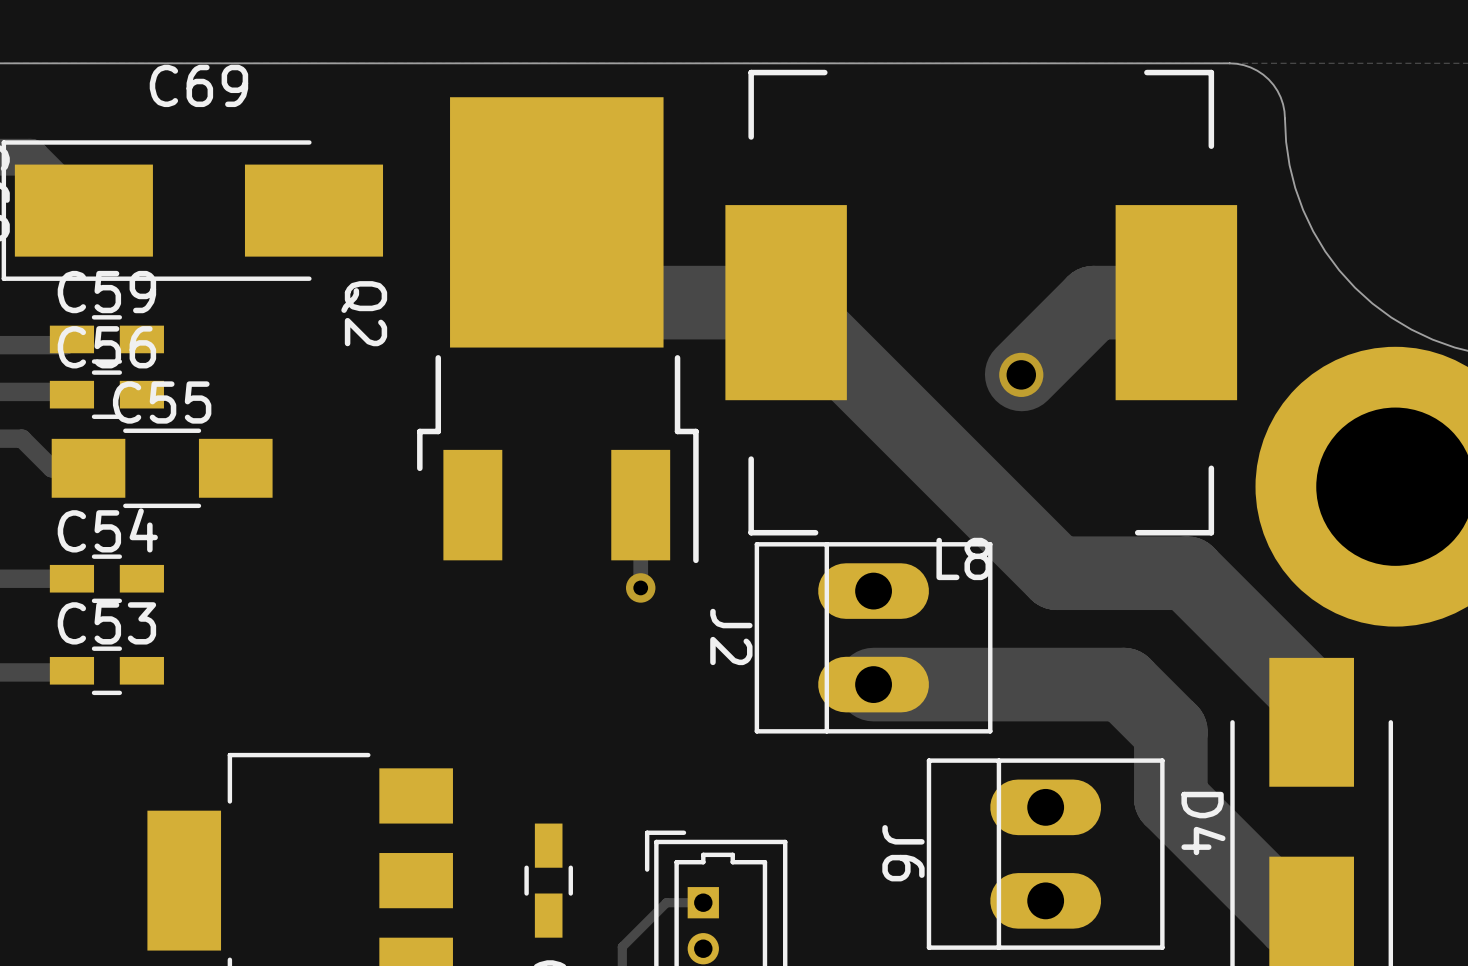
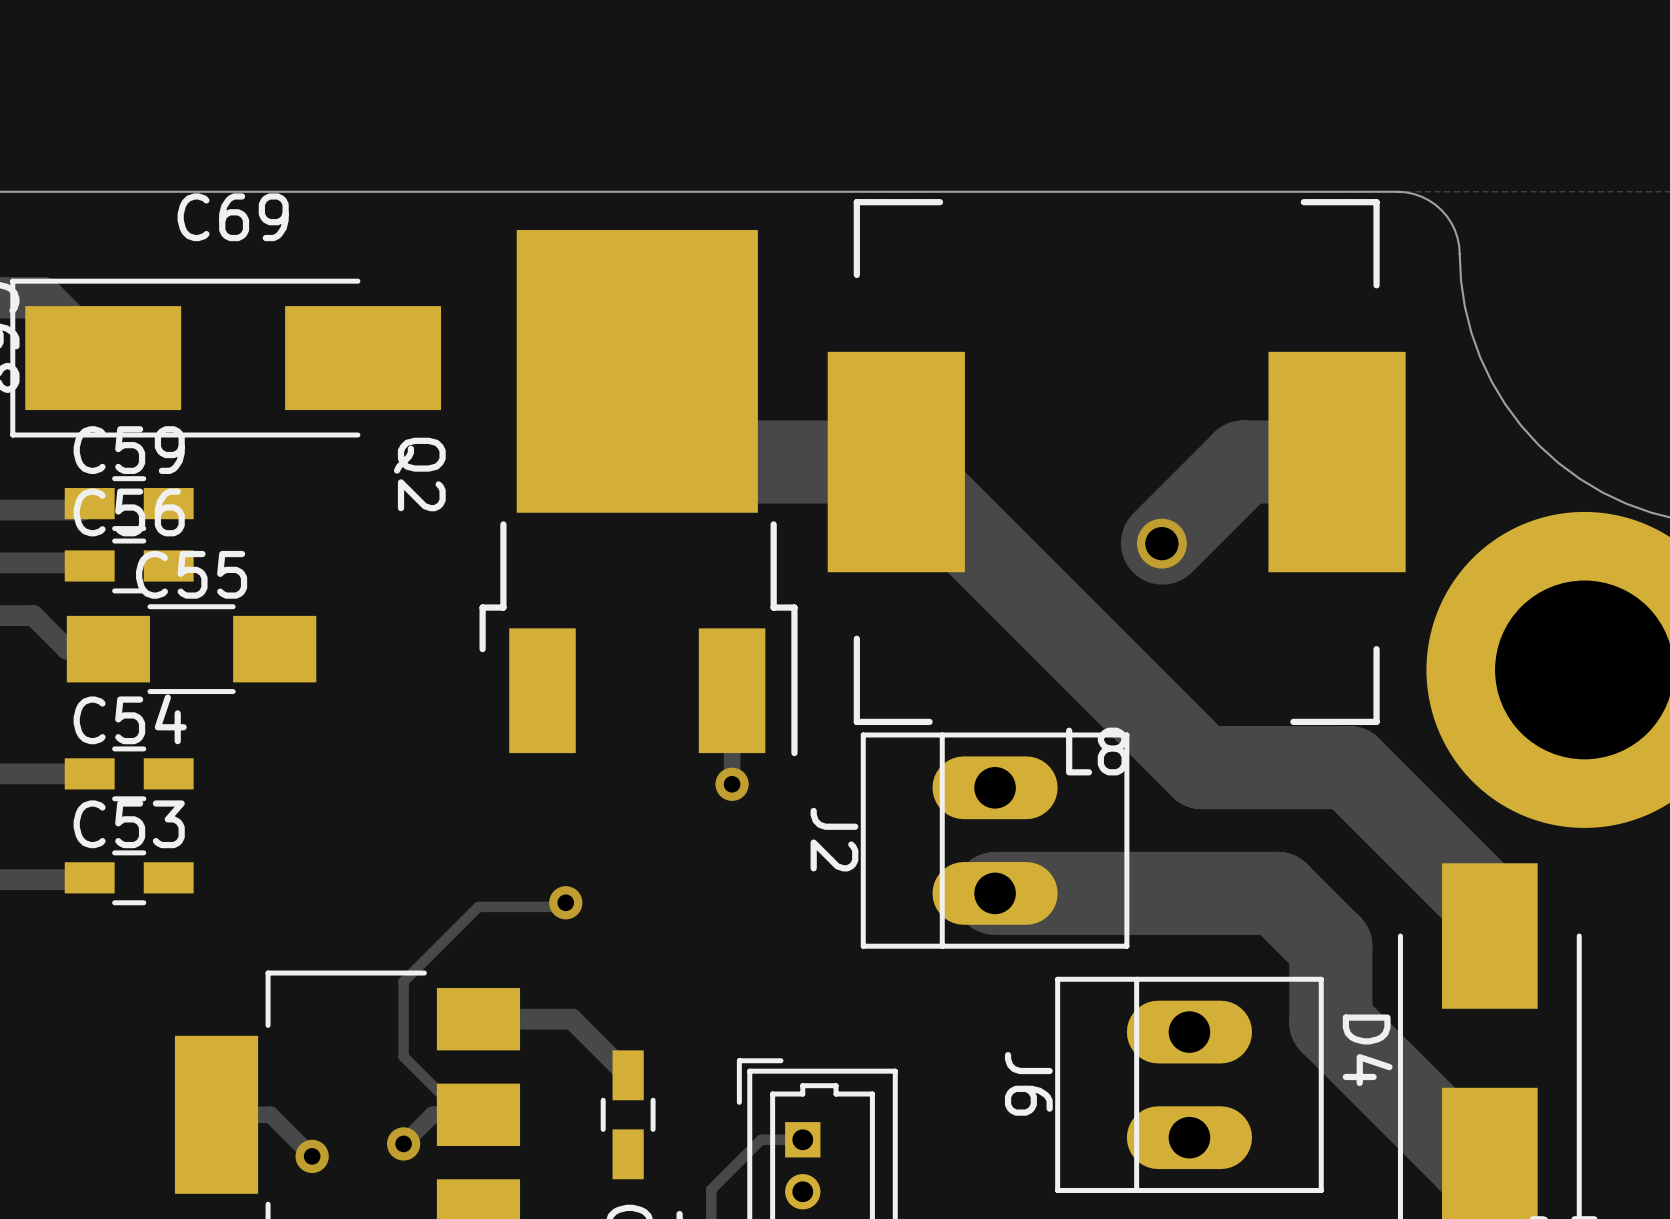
track: none -> (565, 902) (561, 906) (478, 906) (403, 981) (403, 1056) (461, 1114) (478, 1114) (432, 1114) (403, 1143)
via: none -> (565, 902)
track: none -> (478, 1019) (572, 1019) (628, 1075)
track: none -> (216, 1114) (270, 1114) (312, 1156)
via: none -> (403, 1143)
via: none -> (312, 1156)

